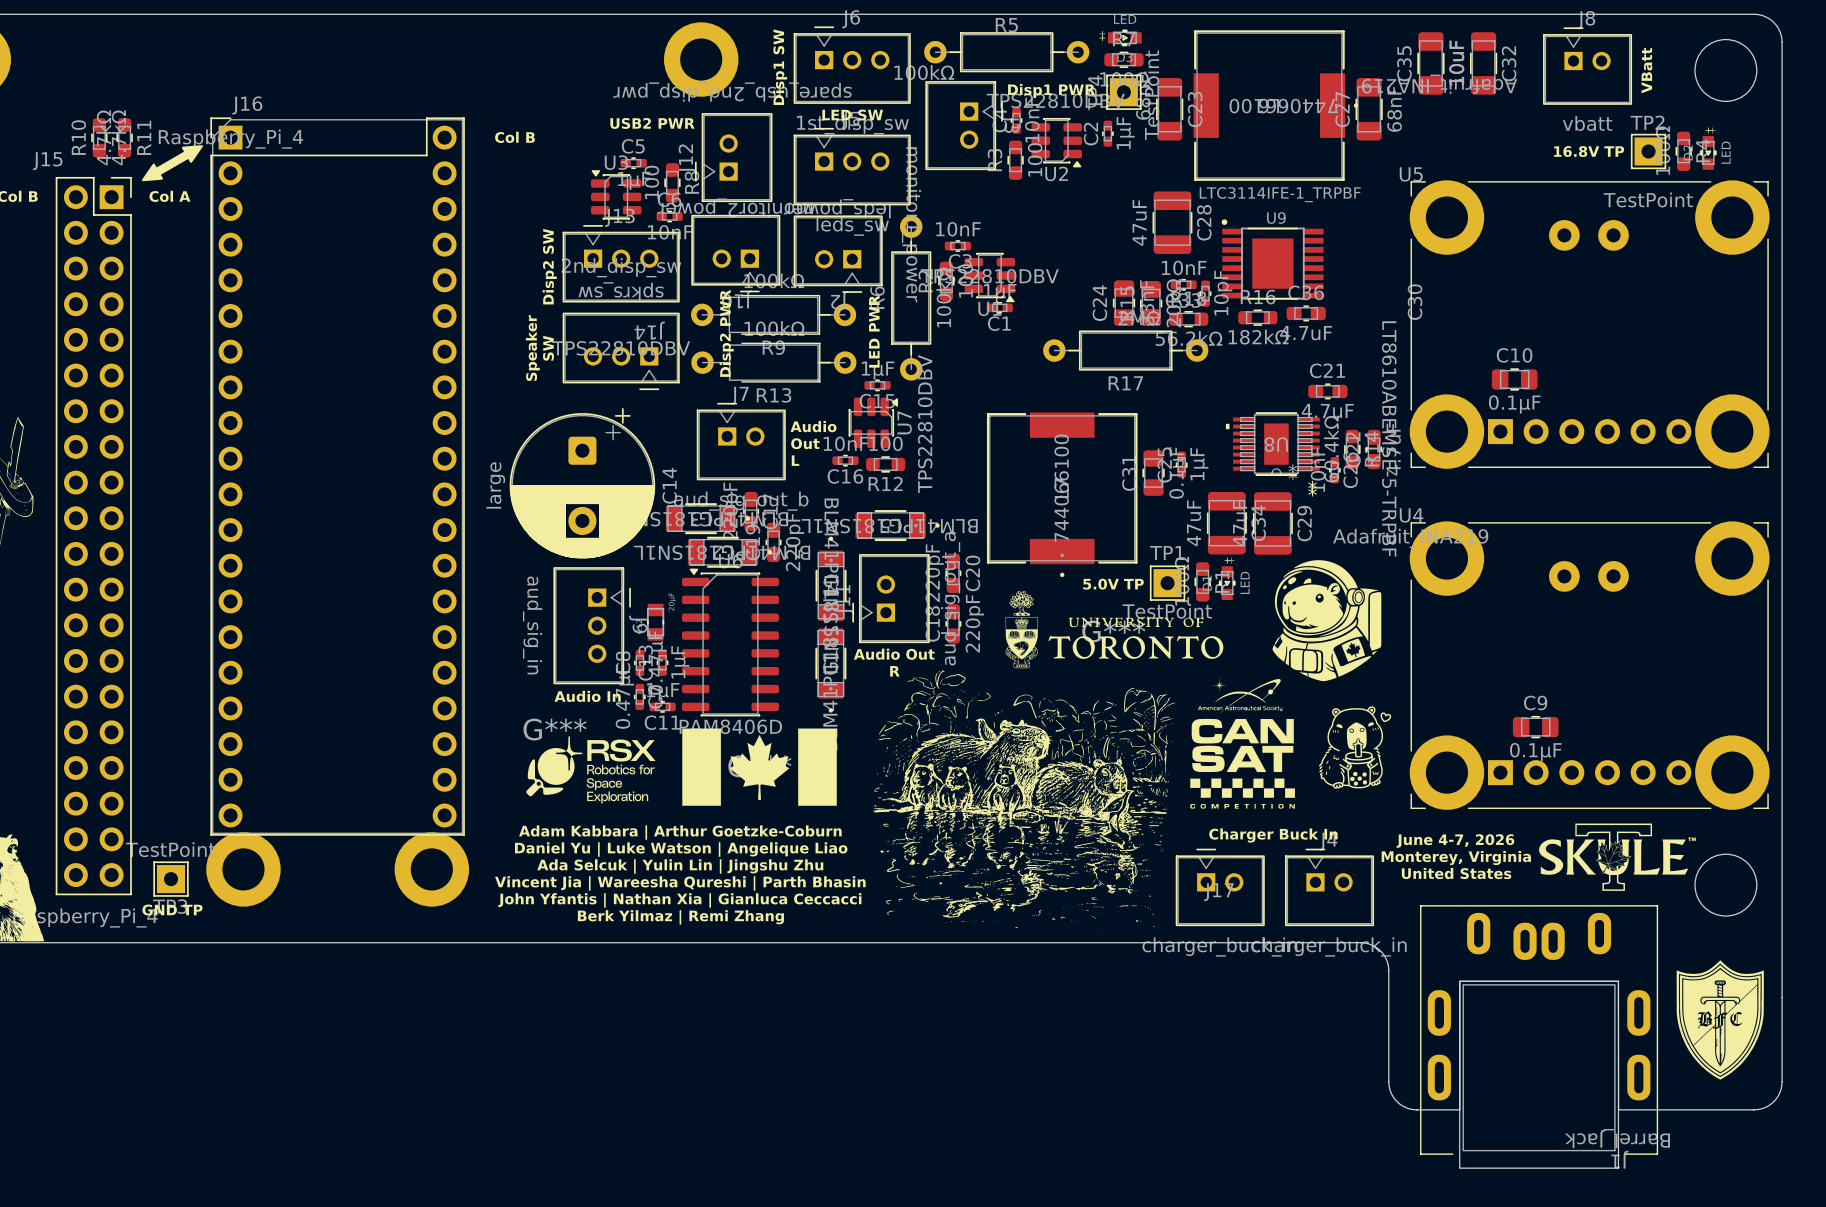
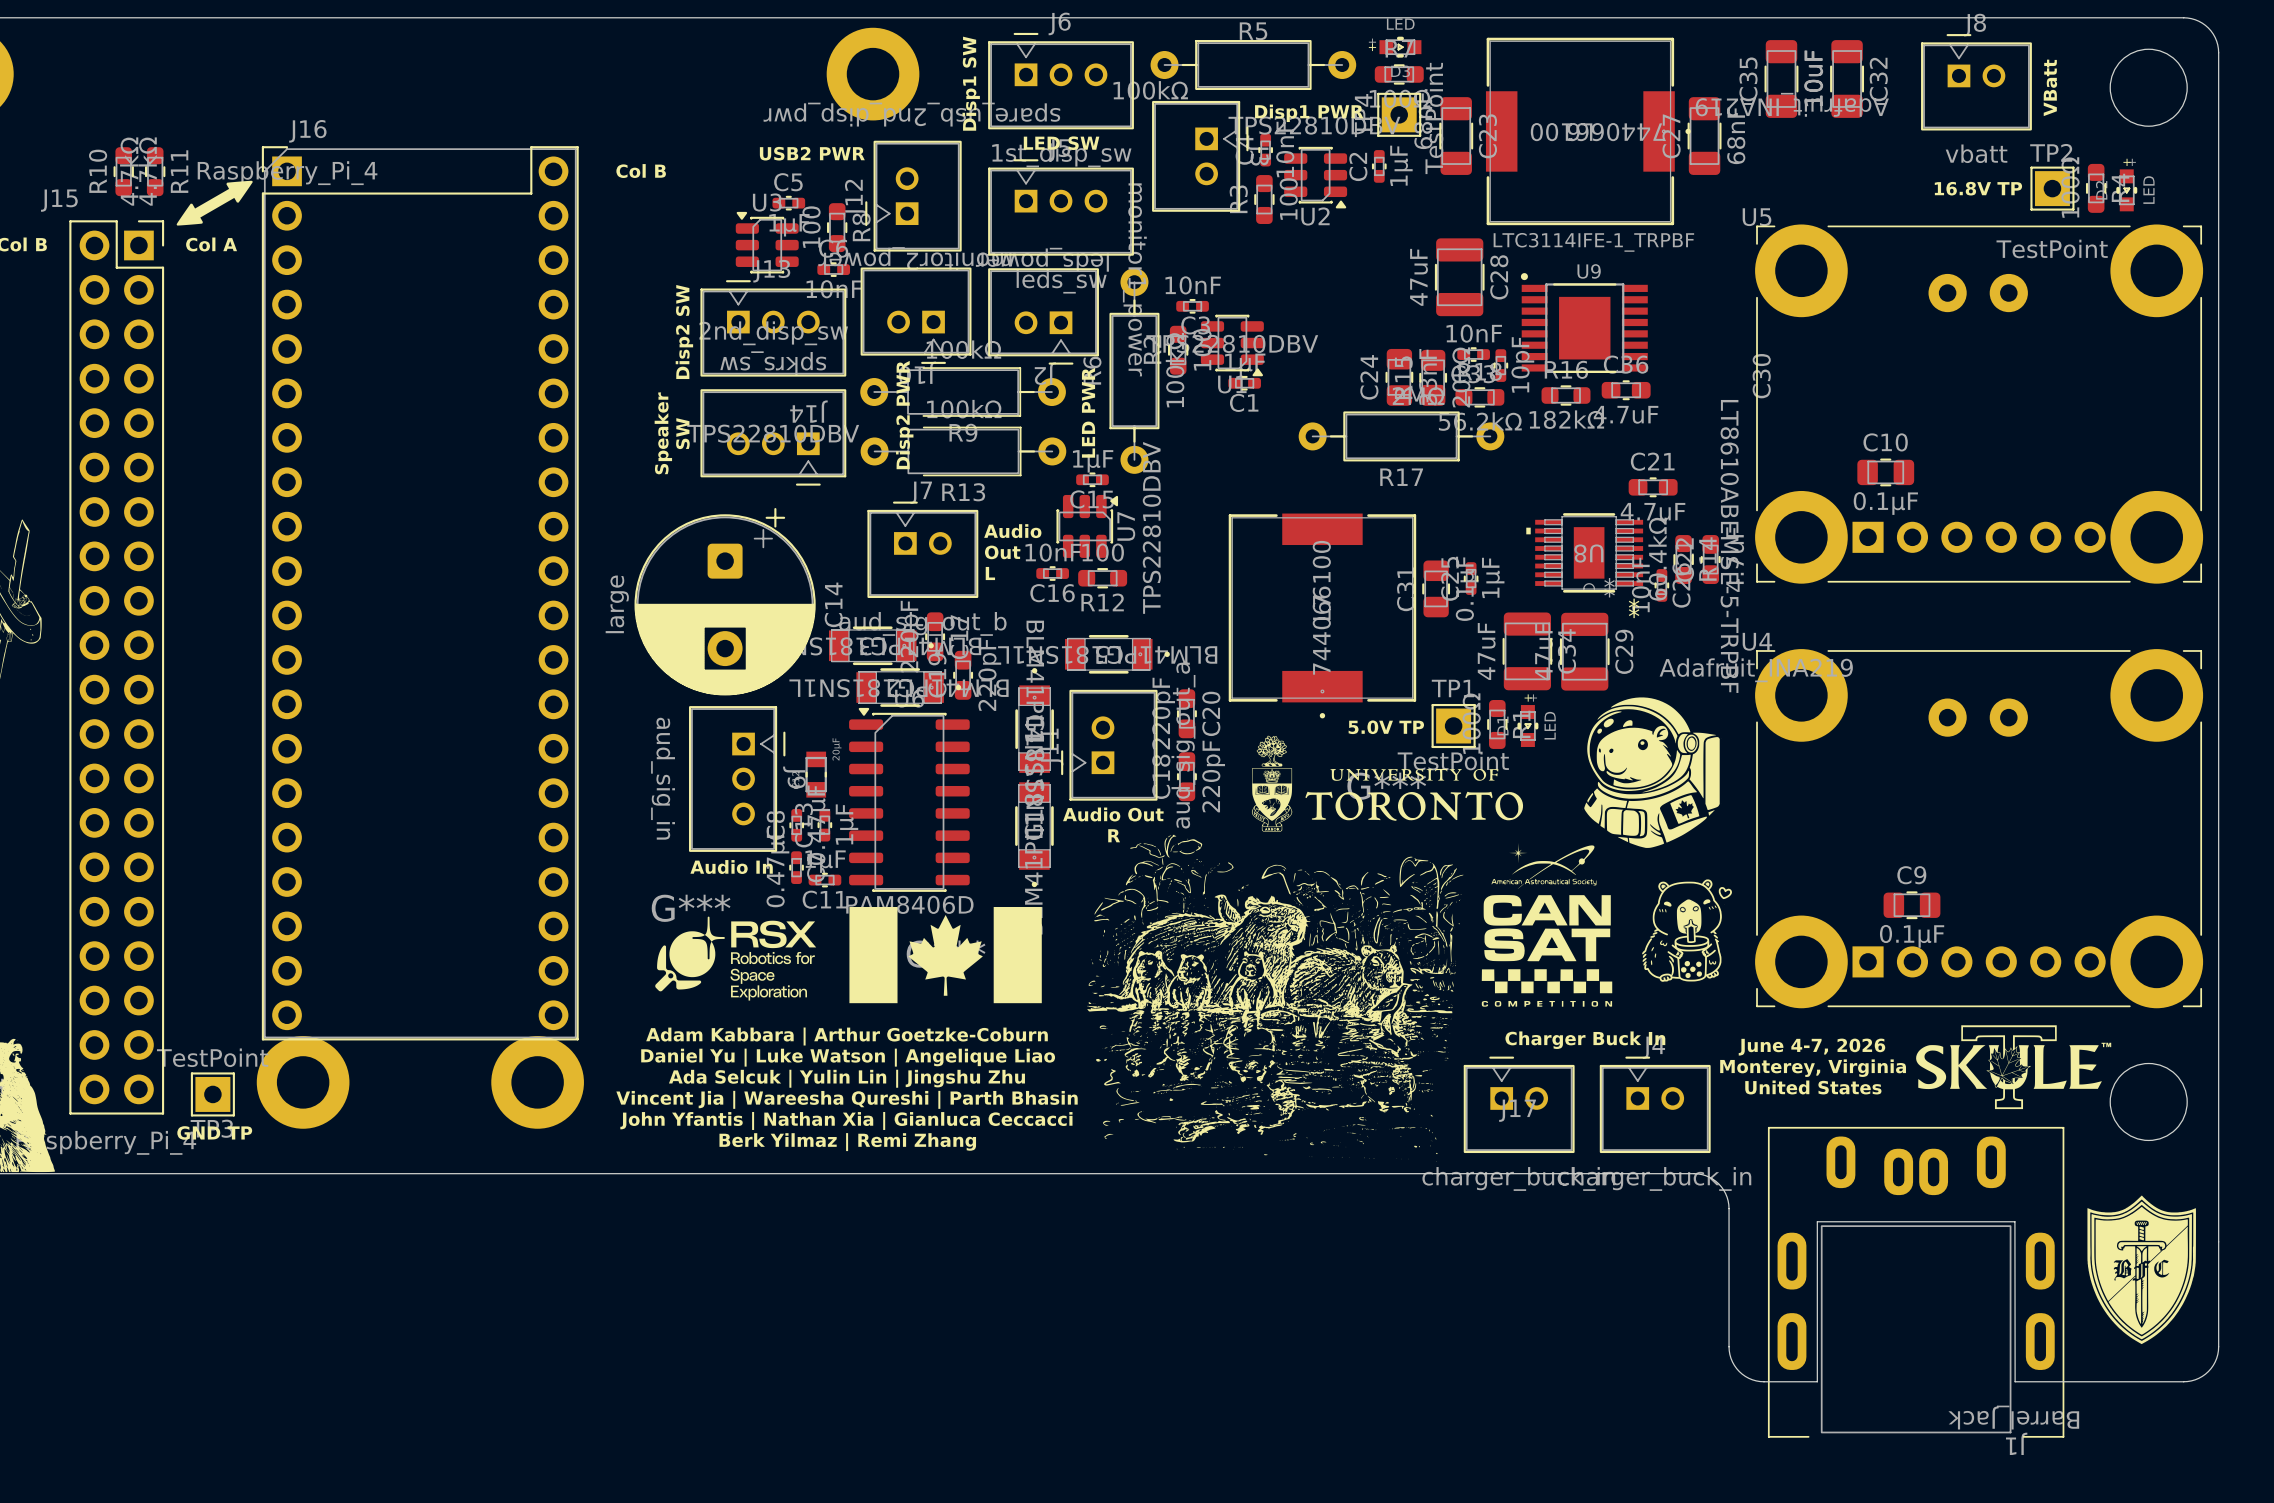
J1 footprint: [1420, 905, 1659, 1169] -> [1767, 1126, 2065, 1438]

